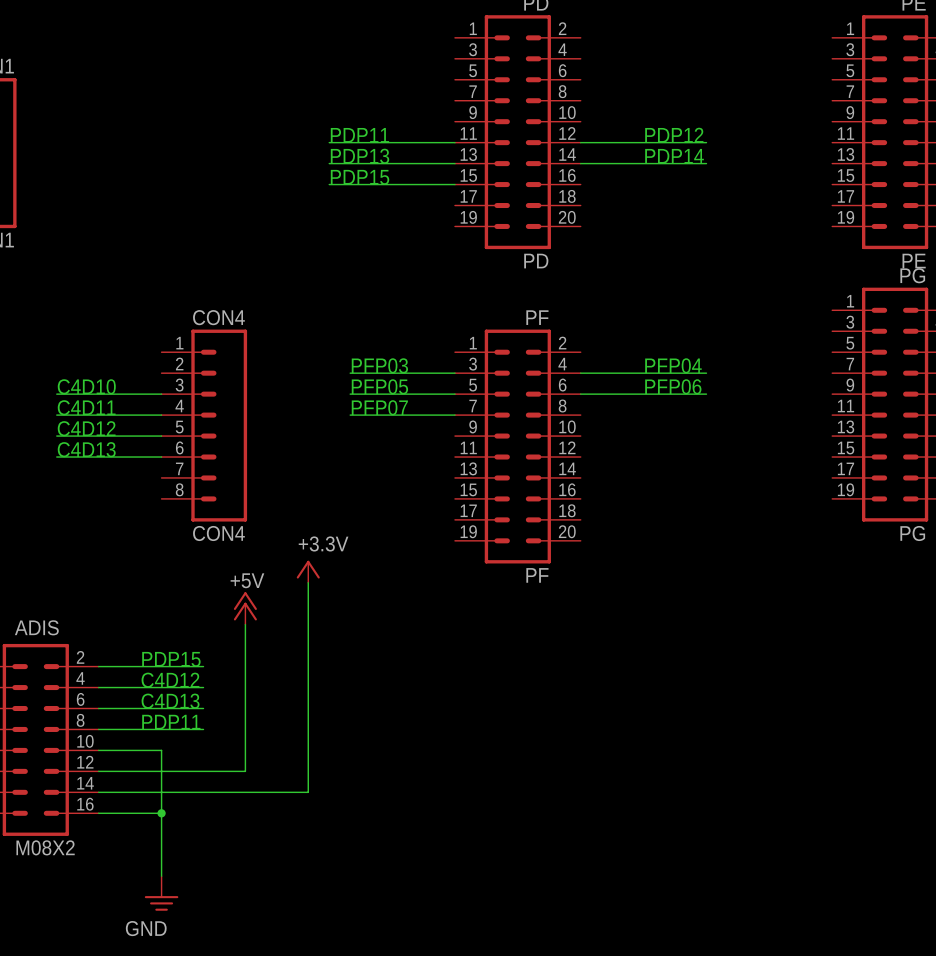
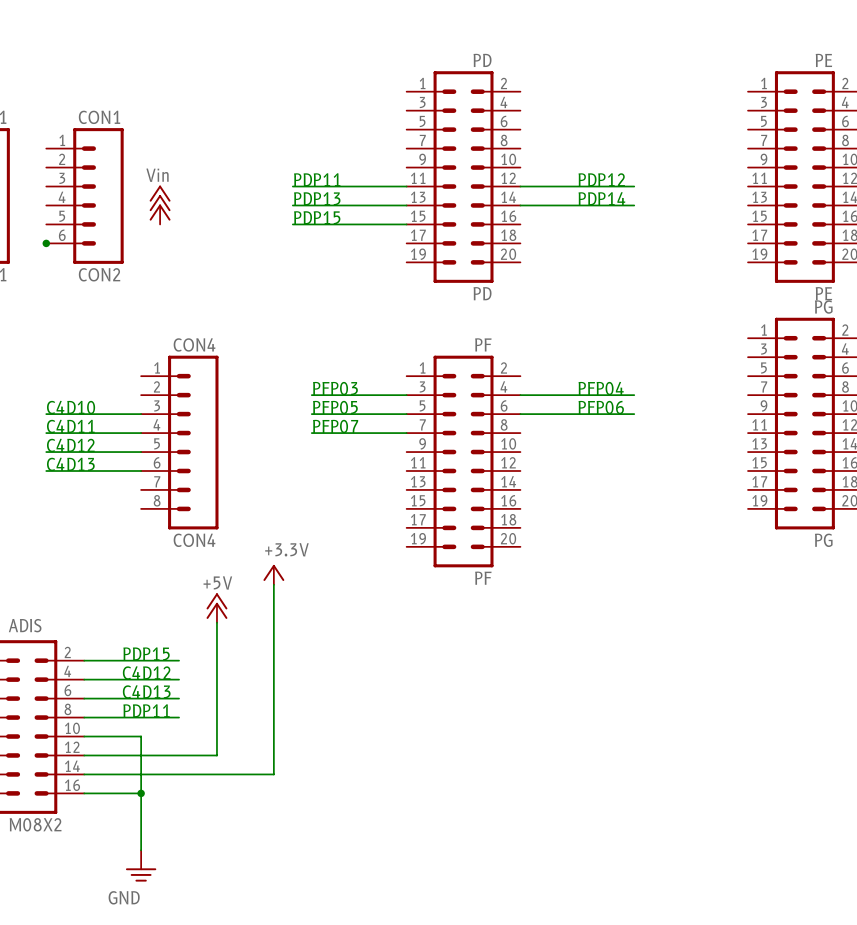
CON2: none -> CON1 (84, 195)
power symbol: none -> Vin (160, 205)
junction: none -> (46, 243)

